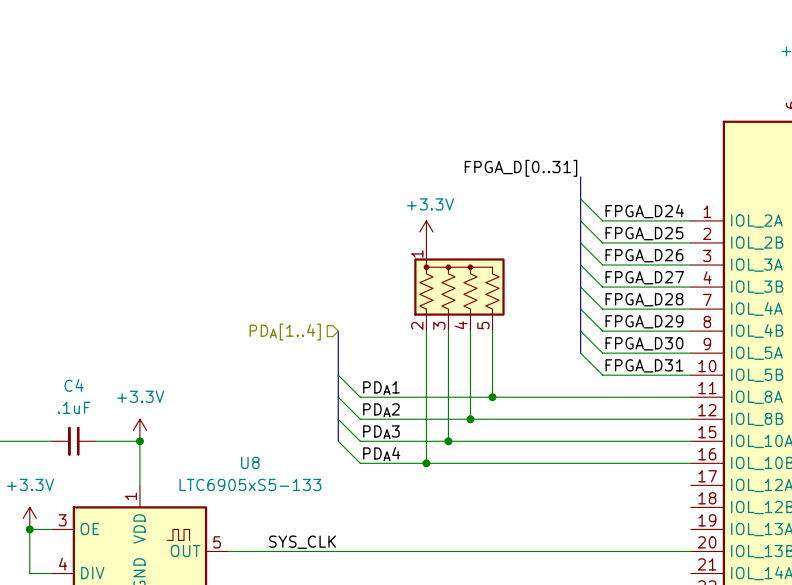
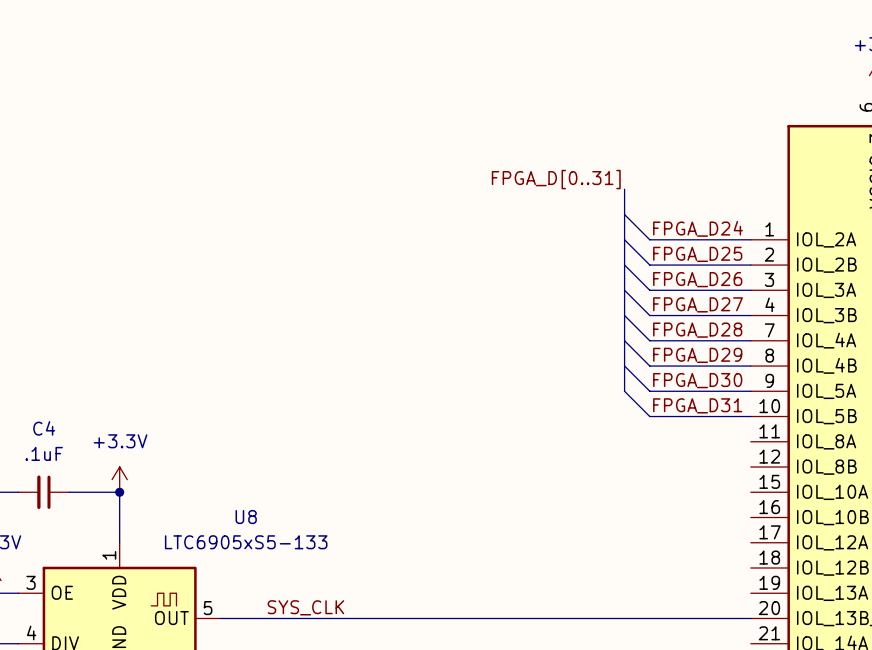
power symbol: +3.3V (426, 231) -> none
part: (459, 287) -> none
bus: (338, 331) (338, 441) -> none
wire: (426, 331) (426, 463) -> none
wire: (448, 331) (448, 441) -> none
wire: (470, 331) (470, 419) -> none
wire: (492, 331) (492, 397) -> none
hierarchical label: PDA[1..4] (285, 332) -> none
wire: (338, 375) (360, 397) (690, 397) -> none
label: PDA1 (381, 388) -> none
wire: (338, 397) (360, 419) (690, 419) -> none
junction: (492, 397) -> none
label: PDA2 (381, 410) -> none
wire: (338, 419) (360, 441) (690, 441) -> none
junction: (470, 419) -> none
label: PDA3 (381, 432) -> none
wire: (338, 441) (360, 463) (690, 463) -> none
junction: (448, 441) -> none
label: PDA4 (381, 454) -> none
junction: (426, 463) -> none

